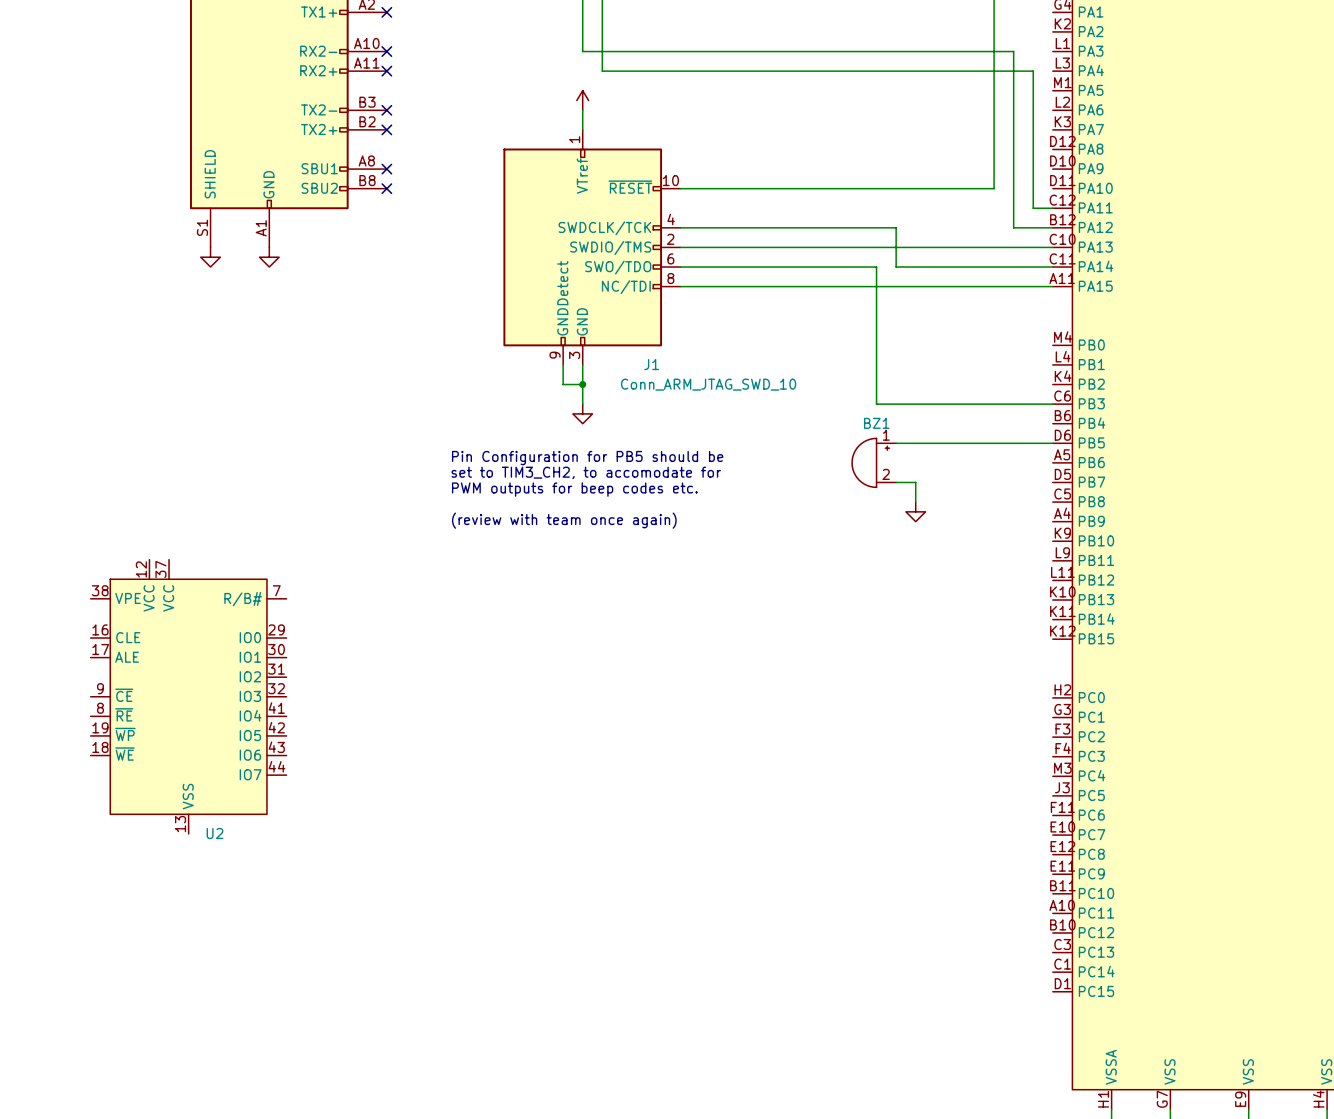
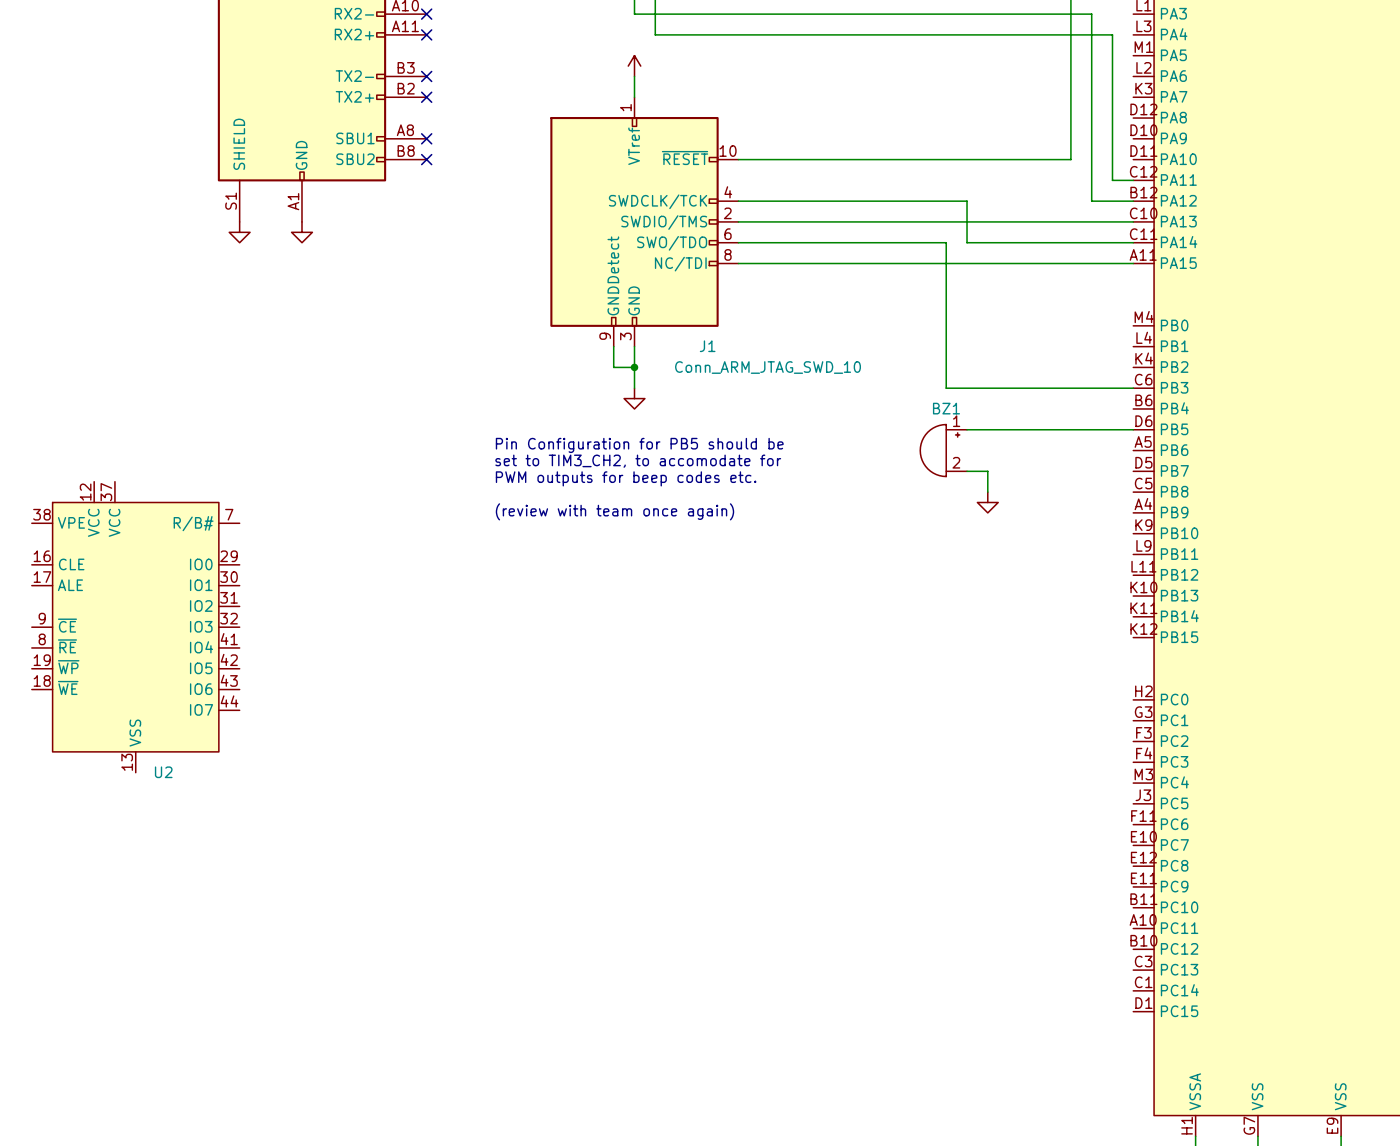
U2 position: (188, 696) -> (135, 627)

